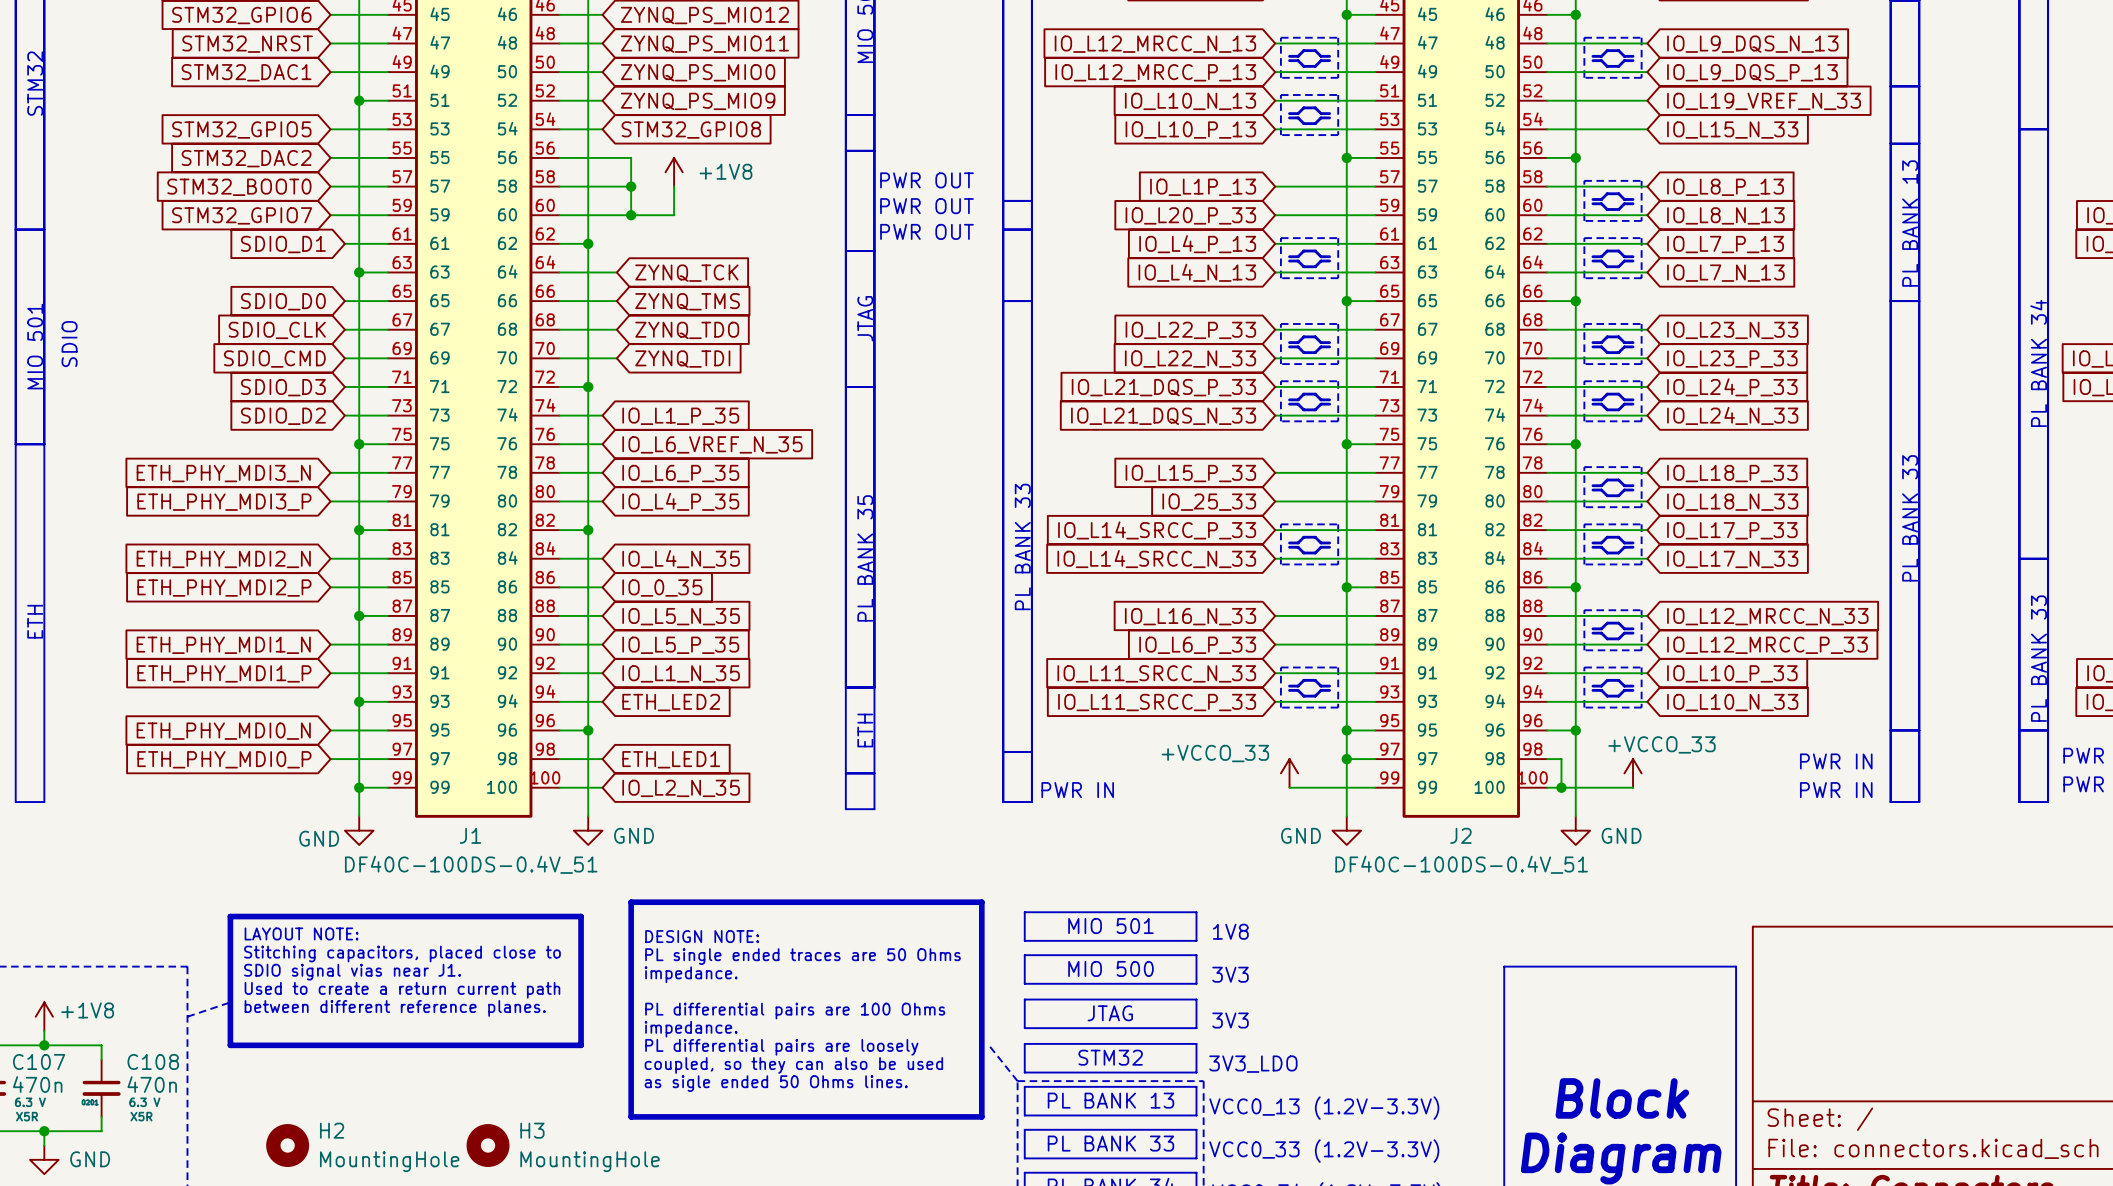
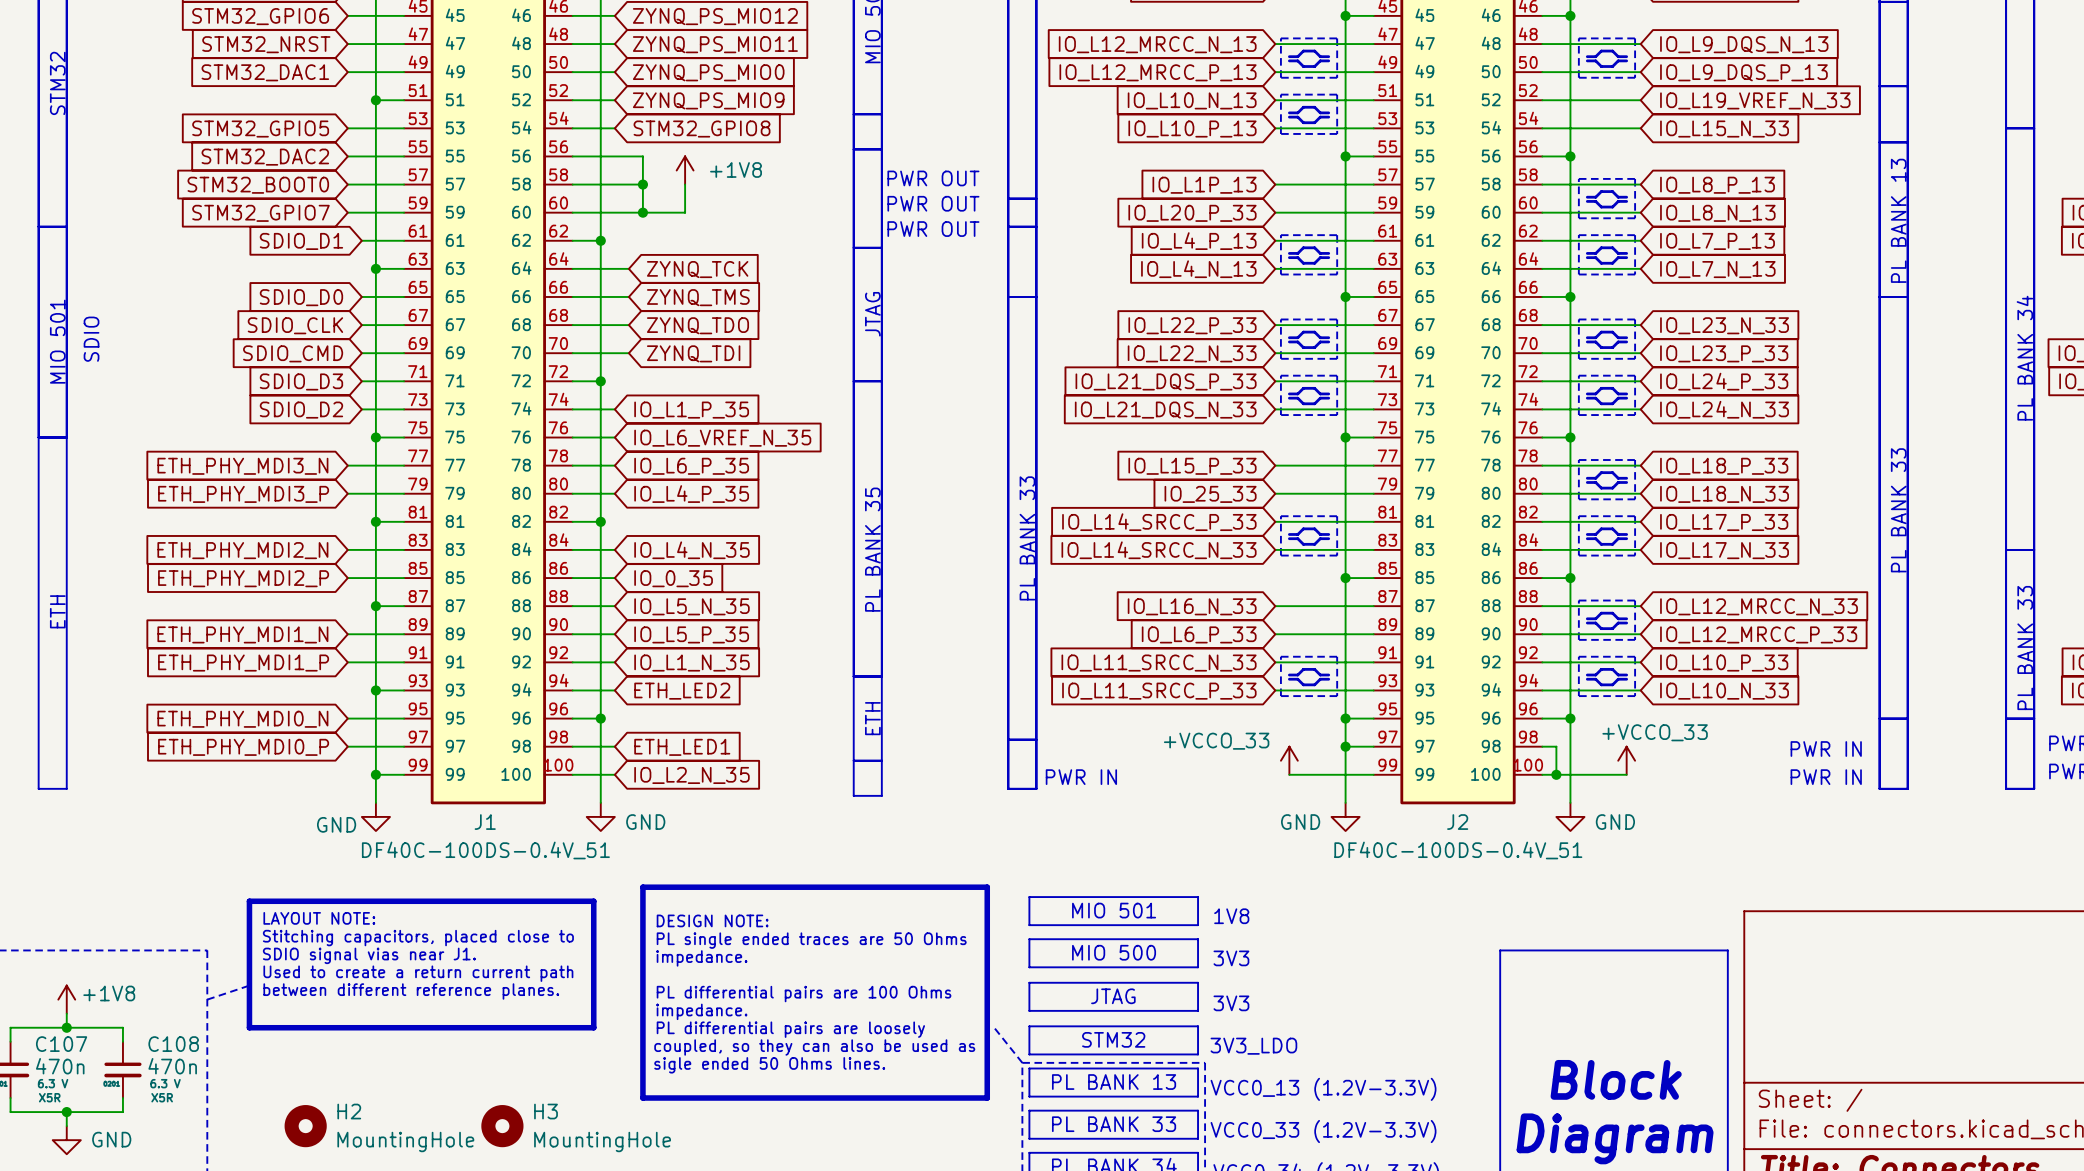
text: coupled, so they can also be used (793, 1065) -> coupled, so they can also be used as (814, 1047)
text: as sigle ended 50 Ohms lines. (776, 1083) -> sigle ended 50 Ohms lines. (769, 1065)

